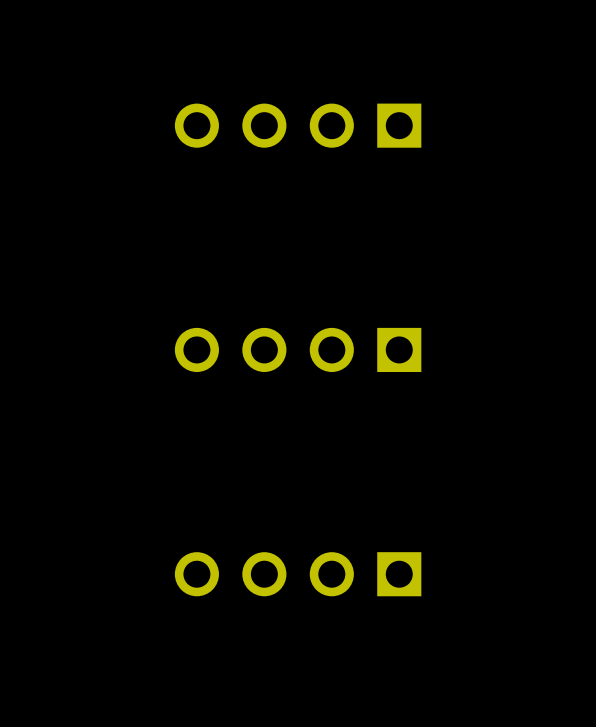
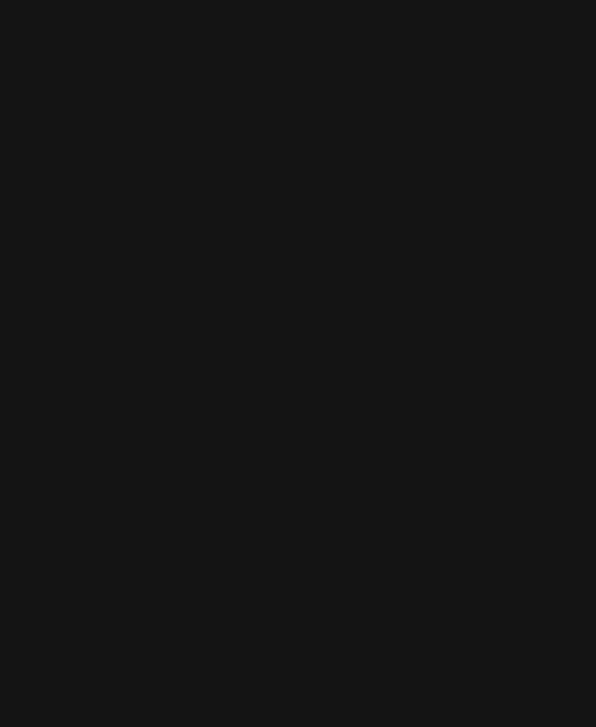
part: (298, 125) -> none
part: (298, 349) -> none
part: (298, 574) -> none

